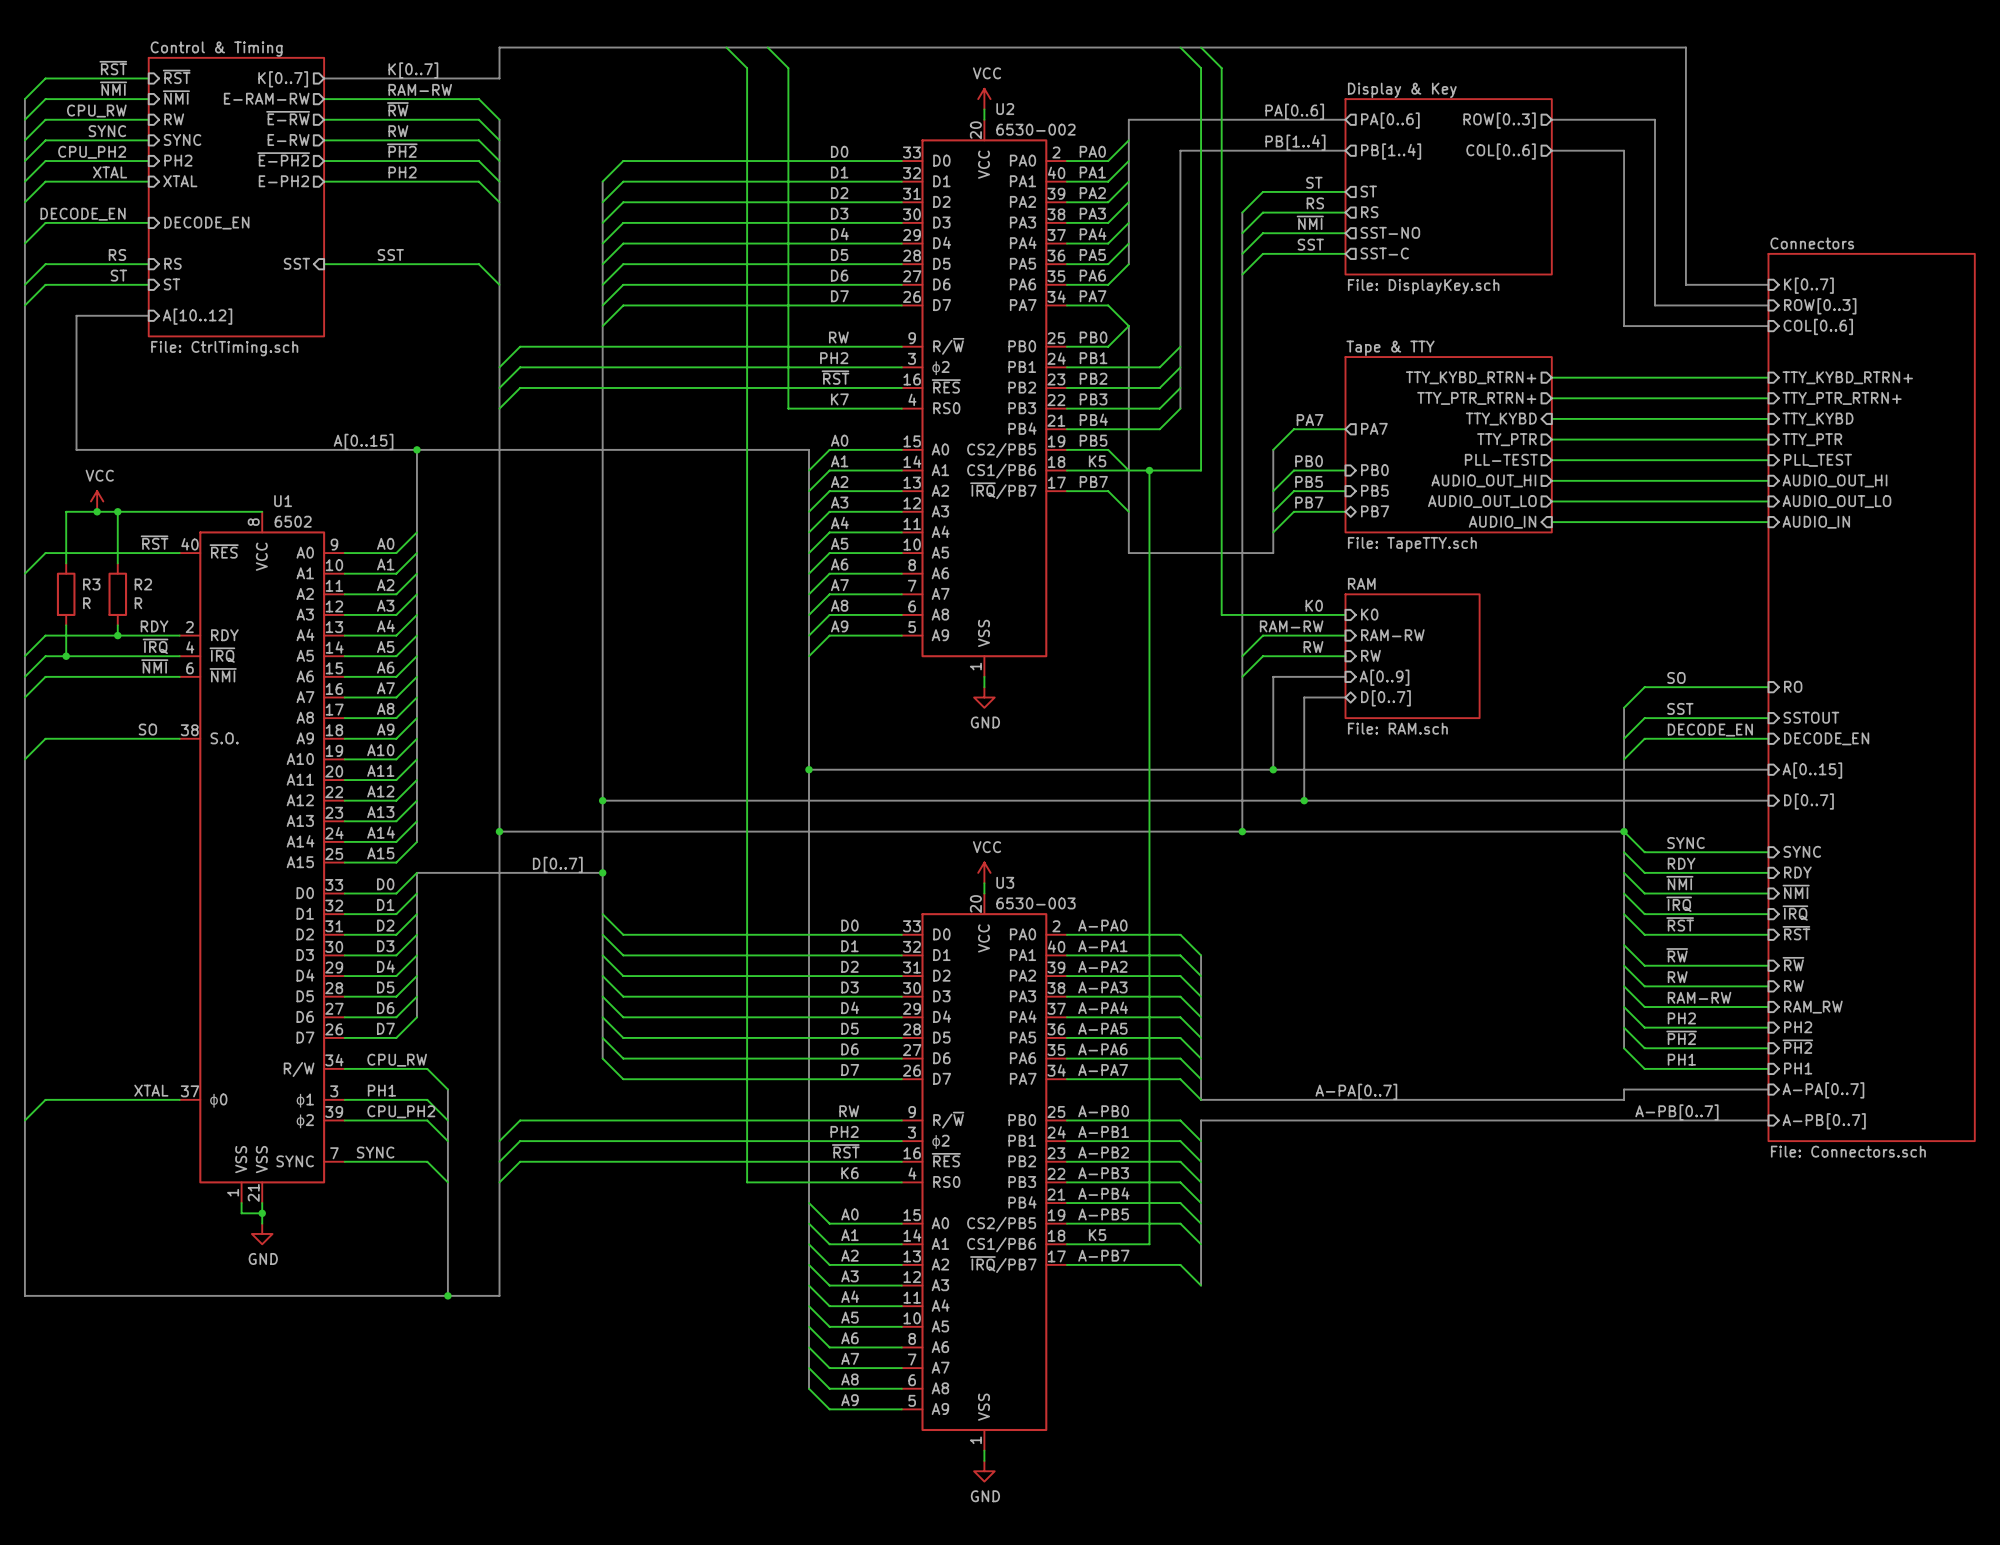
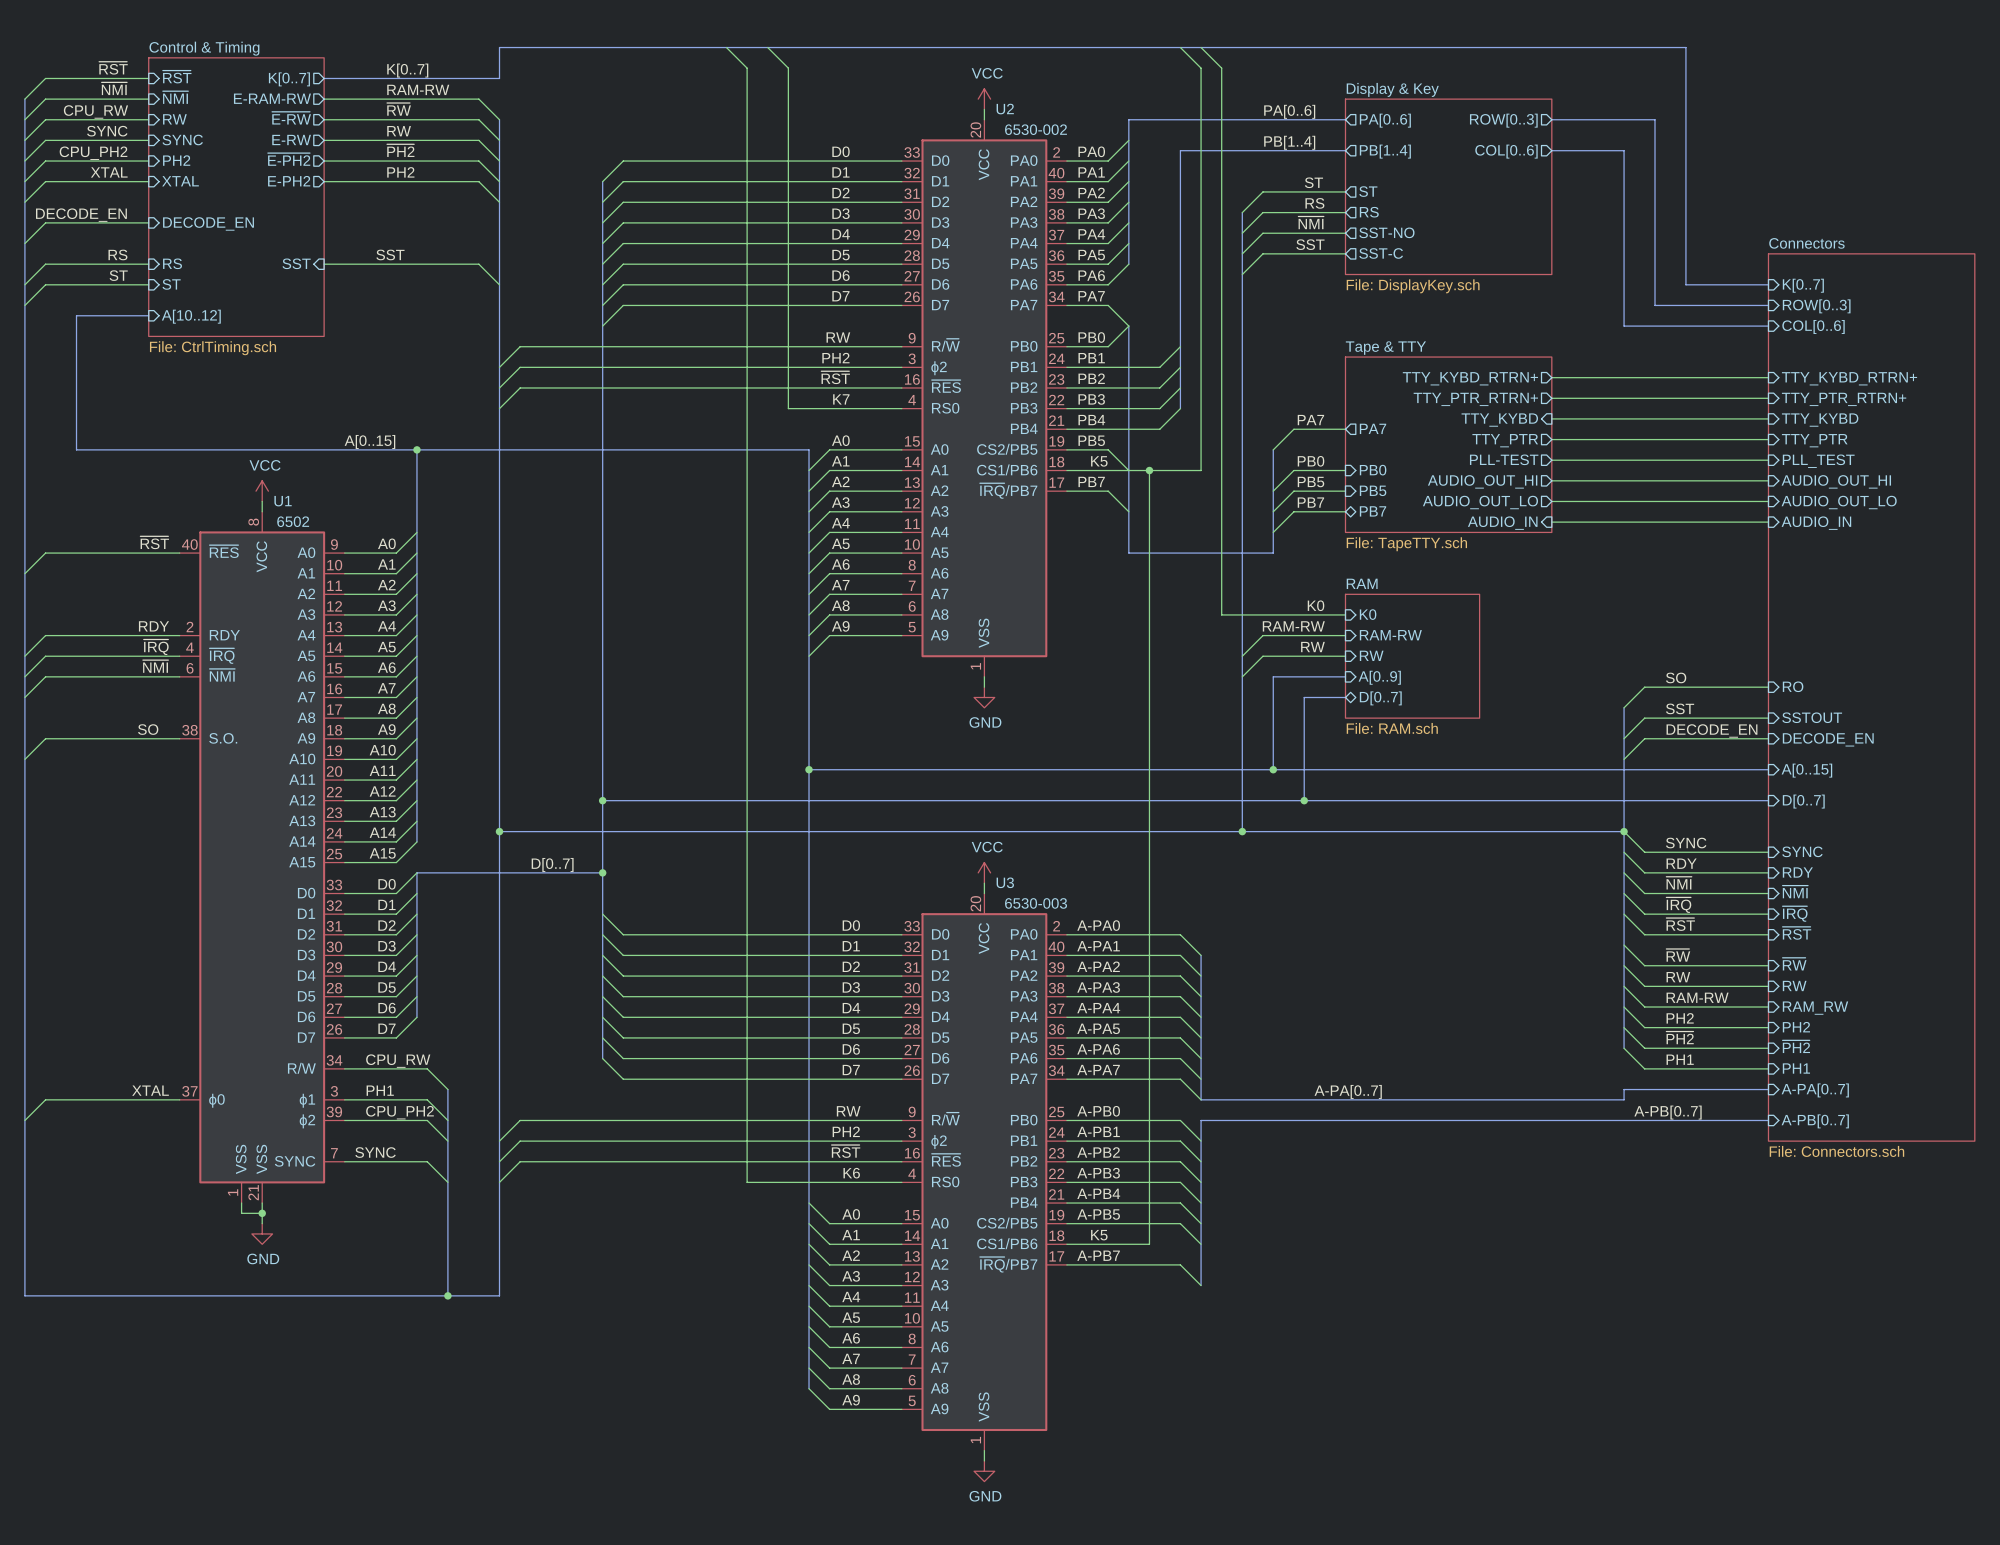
power symbol position: VCC (97, 501) -> VCC (262, 491)
junction: (97, 511) -> none
wire: (117, 511) (117, 563) -> none
junction: (117, 511) -> none
wire: (262, 511) (66, 511) (66, 563) -> (262, 511) (262, 501)
R3: R (66, 594) -> none
R2: R (117, 594) -> none
wire: (66, 625) (66, 656) -> none
wire: (117, 625) (117, 635) -> none
junction: (117, 635) -> none
junction: (66, 656) -> none

